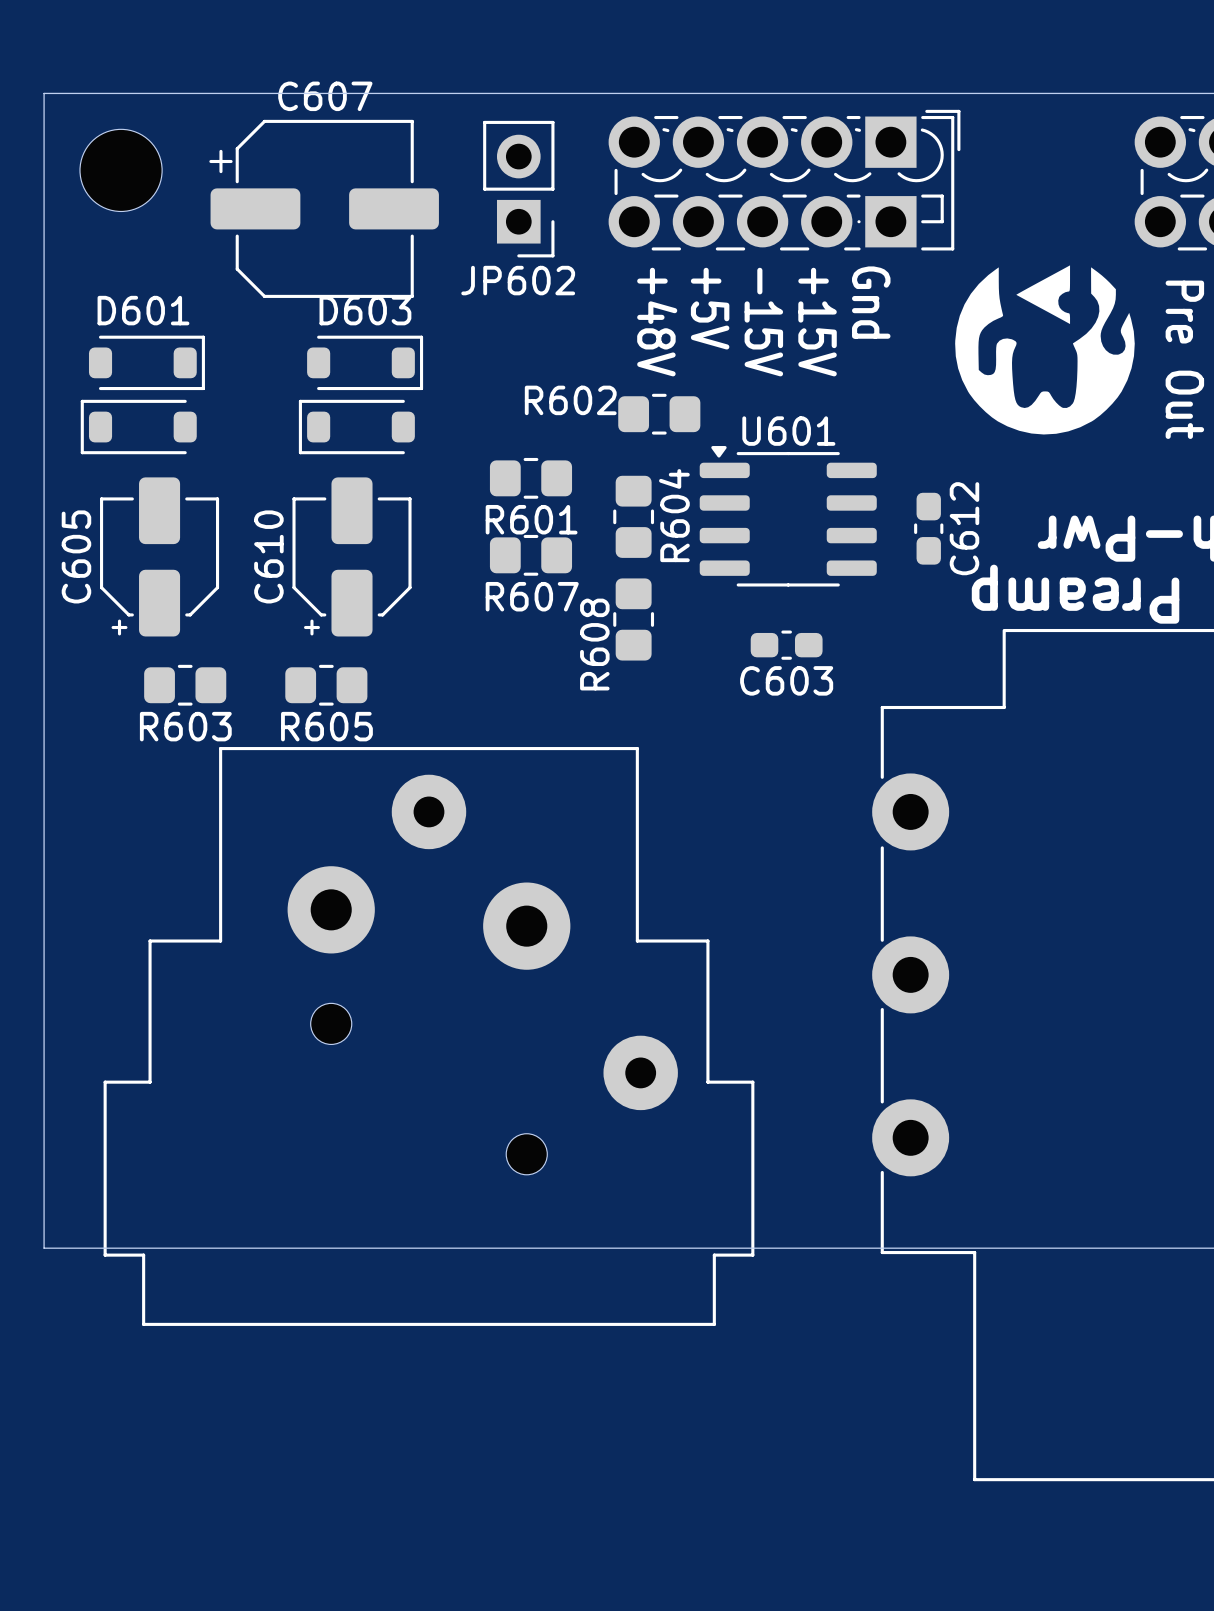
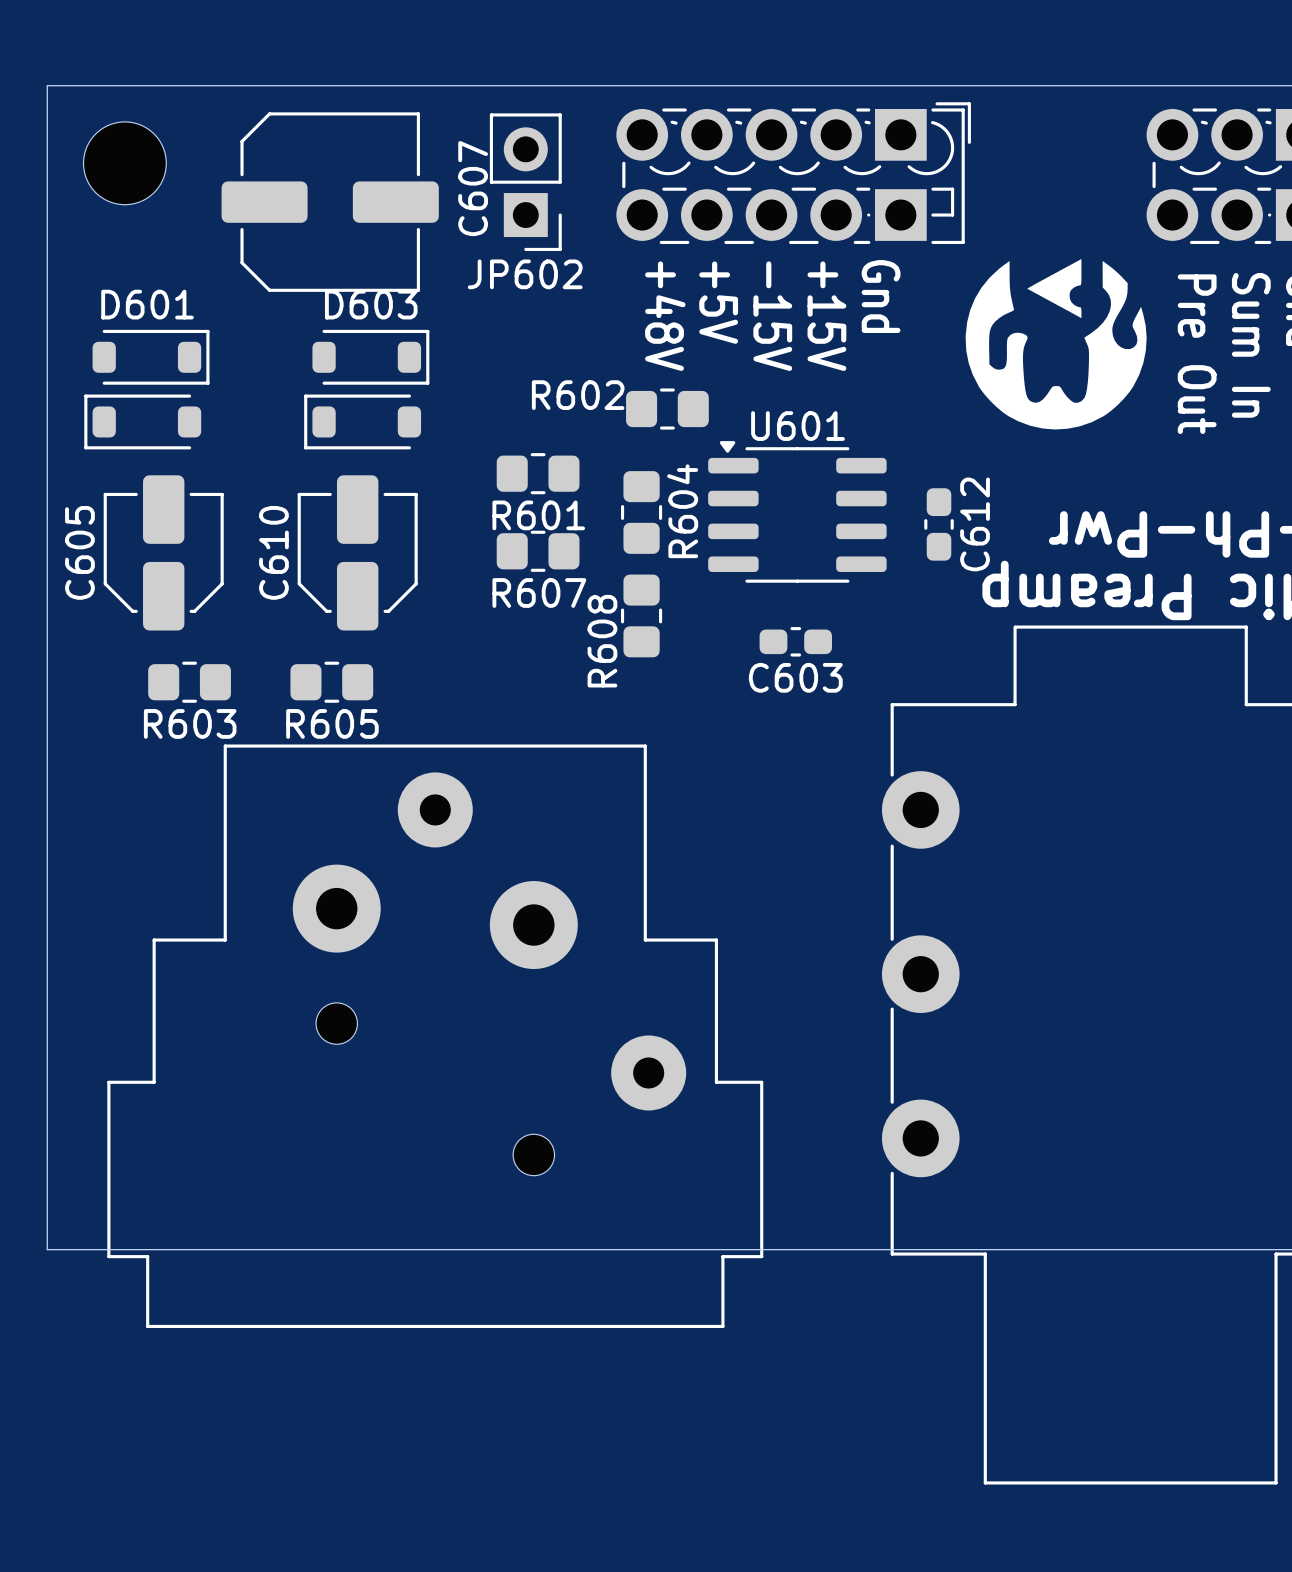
C607 name position: C607 (325, 96) -> C607 (473, 188)
C607 footprint: [209, 119, 439, 298] -> [221, 112, 439, 292]
C605 footprint: [100, 477, 220, 637] -> [103, 475, 224, 631]
C610 footprint: [292, 477, 412, 637] -> [297, 475, 418, 631]

